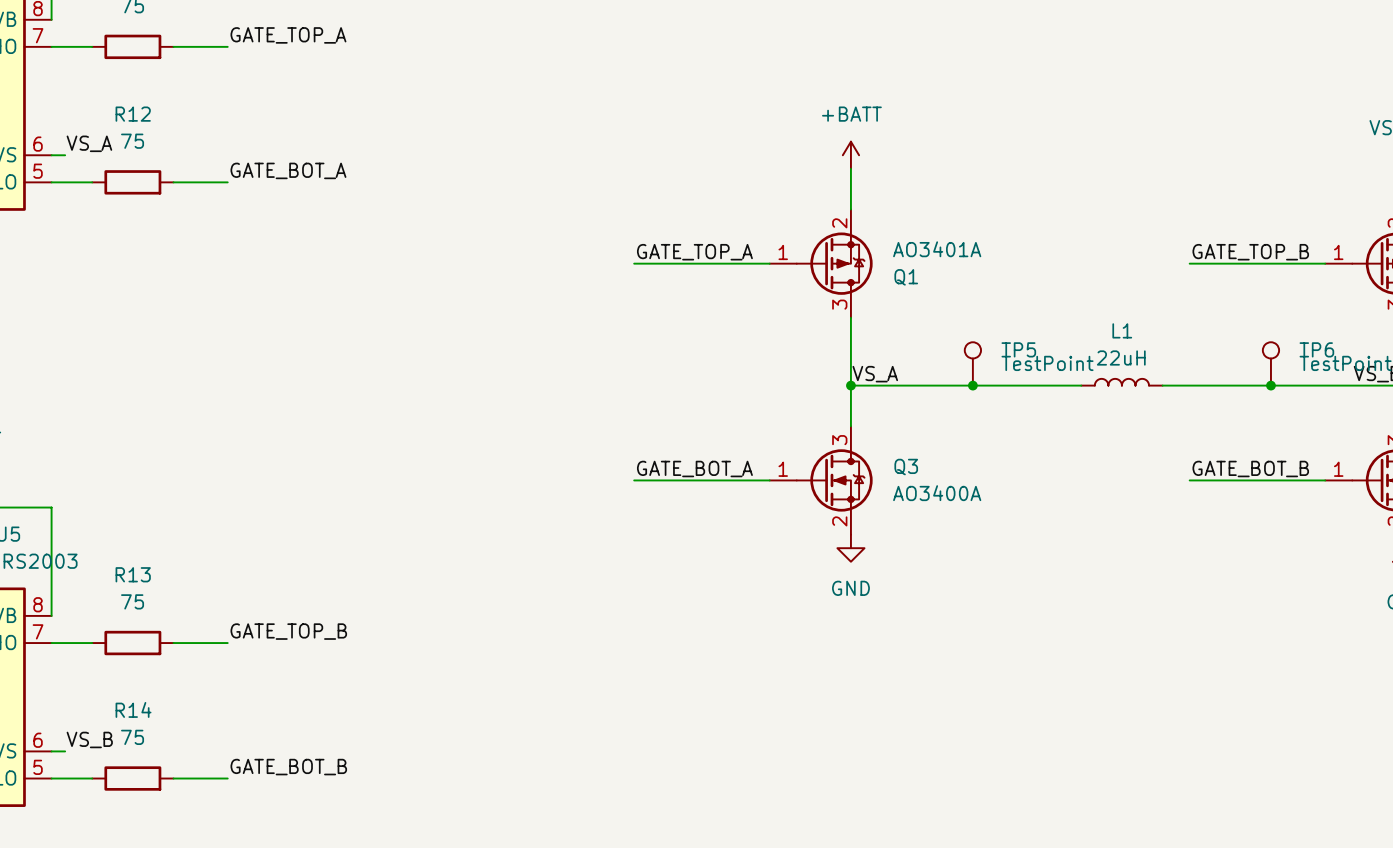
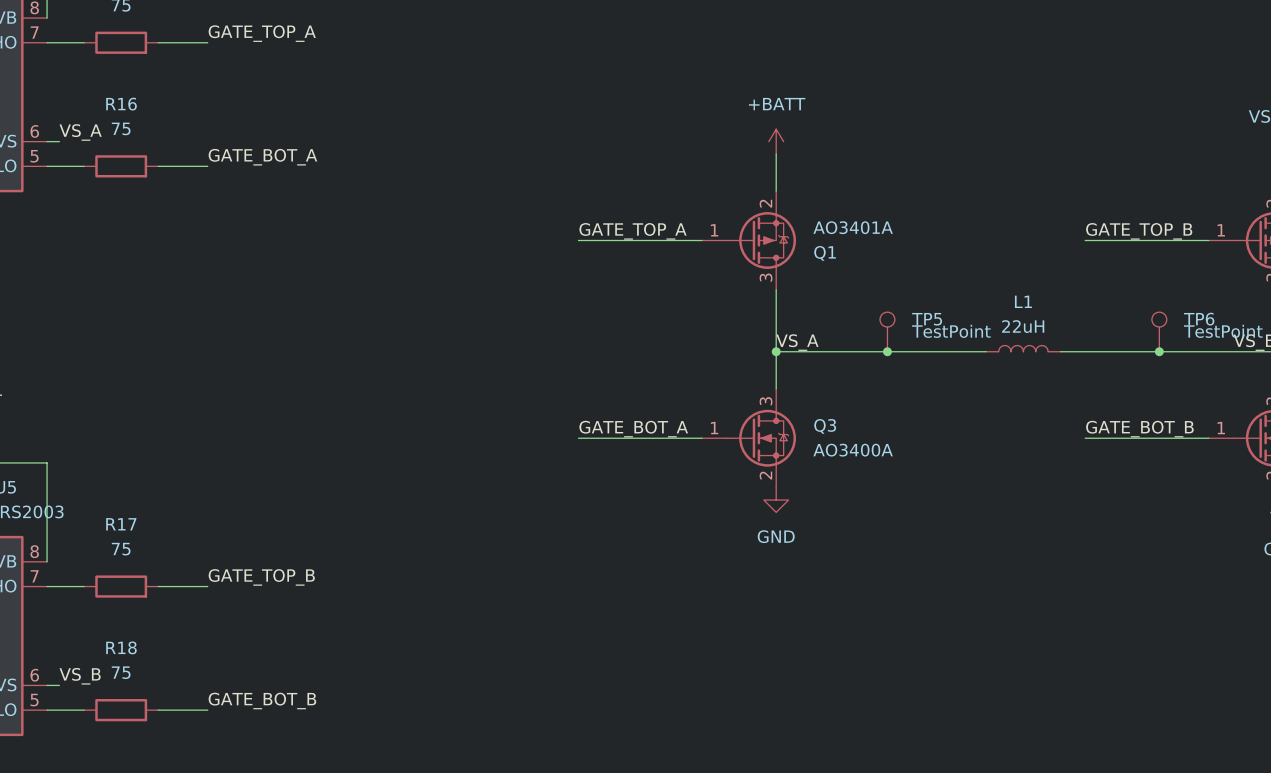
R12 name: R12 (133, 114) -> R16 (121, 104)
R13 name: R13 (133, 574) -> R17 (121, 524)
R14 name: R14 (133, 709) -> R18 (121, 647)

